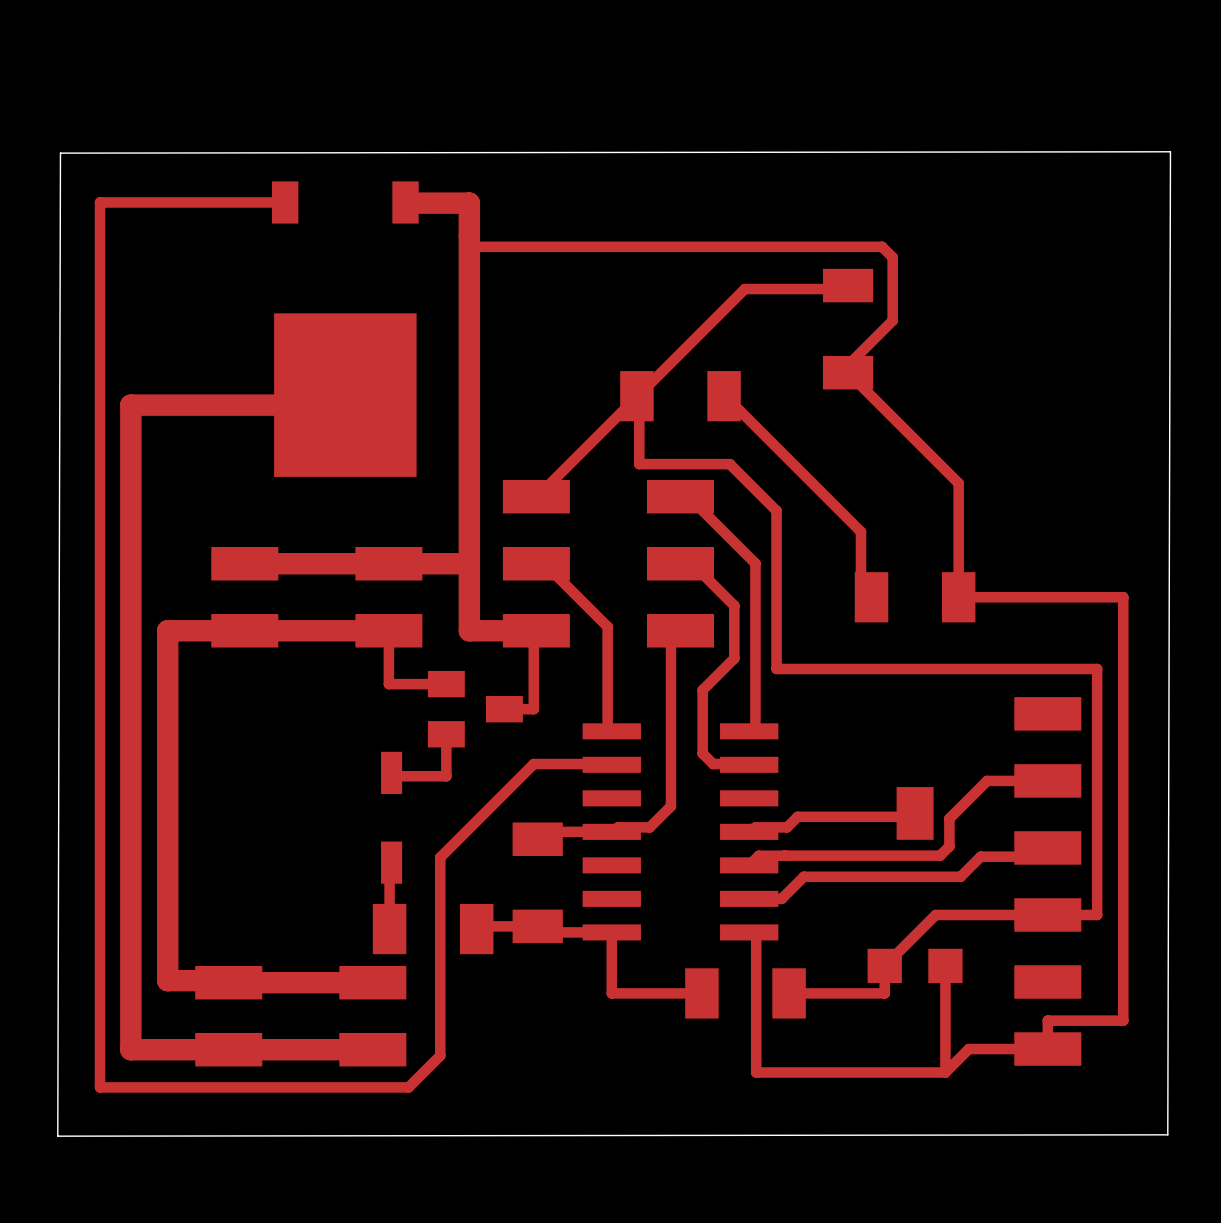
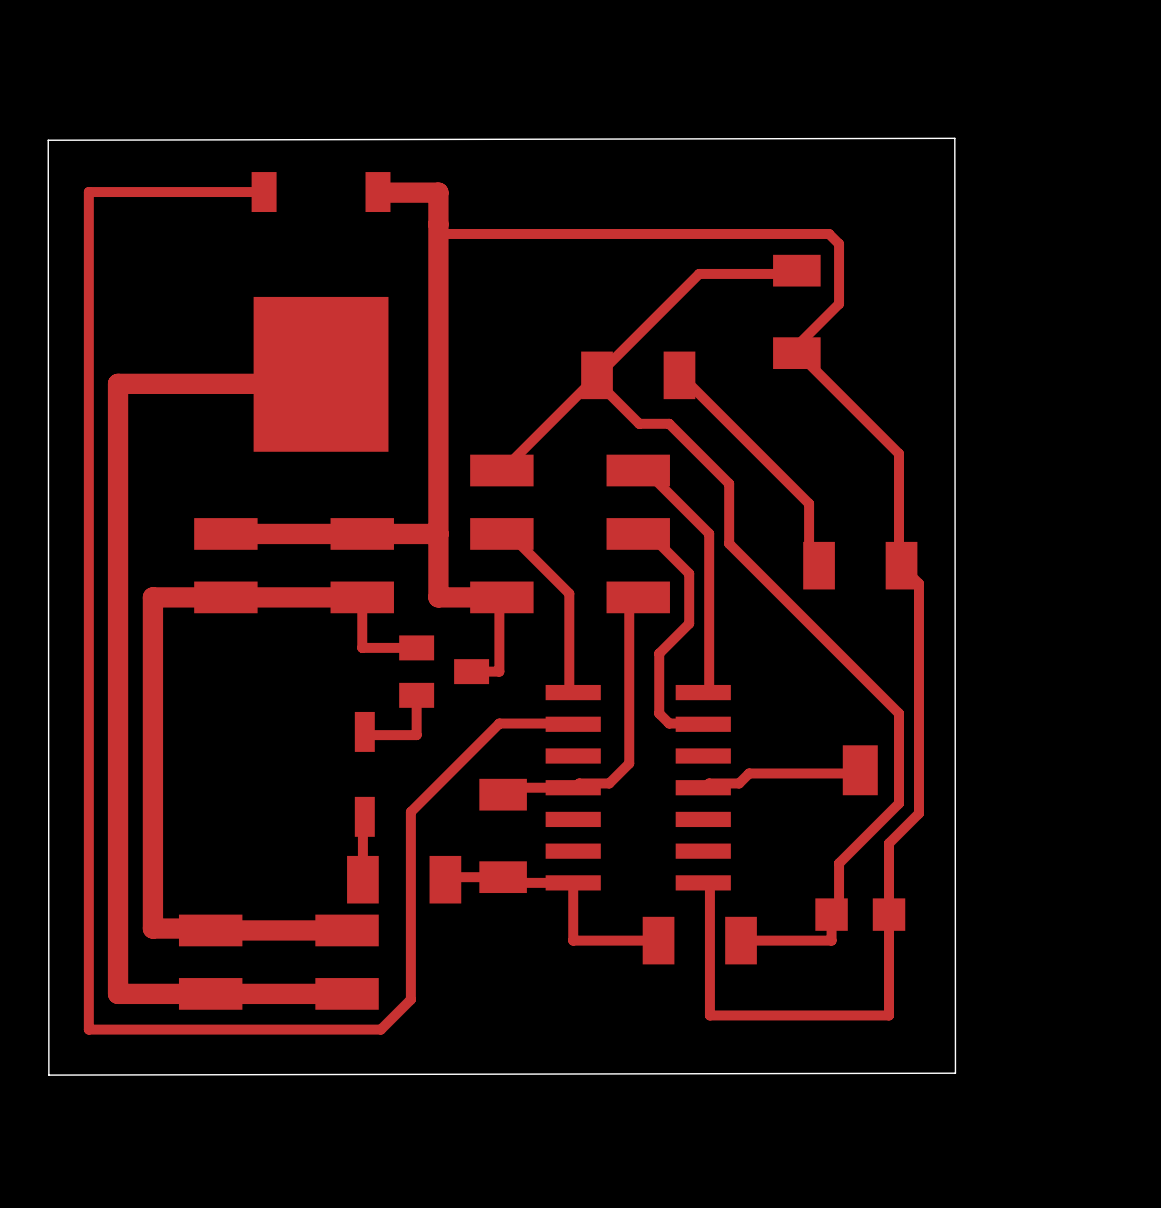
board edge: (1170, 151) (60, 153) (57, 1136) (1167, 1134) (1170, 151) -> (954, 138) (955, 1073) (48, 1075) (48, 140) (954, 138)
top track: (848, 372) (958, 483) (958, 597) (1123, 597) (1123, 1020) (1047, 1020) (1047, 1049) (968, 1049) (945, 1072) -> (796, 353) (899, 453) (899, 563) (918, 583) (918, 813) (889, 843) (889, 914)
top track: (639, 394) (639, 464) (729, 464) -> (597, 375) (599, 383) (639, 423) (669, 423) (684, 439)
top track: (776, 574) (776, 668) (1097, 668) (1097, 914) (935, 914) (884, 965) -> (729, 543) (899, 713) (899, 803) (839, 863) (839, 913) (831, 914)
top track: (1047, 780) (987, 780) (949, 818) (949, 846) (940, 855) (758, 855) (749, 865) -> none
top track: (1047, 847) (1039, 856) (980, 856) (960, 876) (803, 876) (781, 898) (749, 898) -> none
part: (1047, 881) -> none

